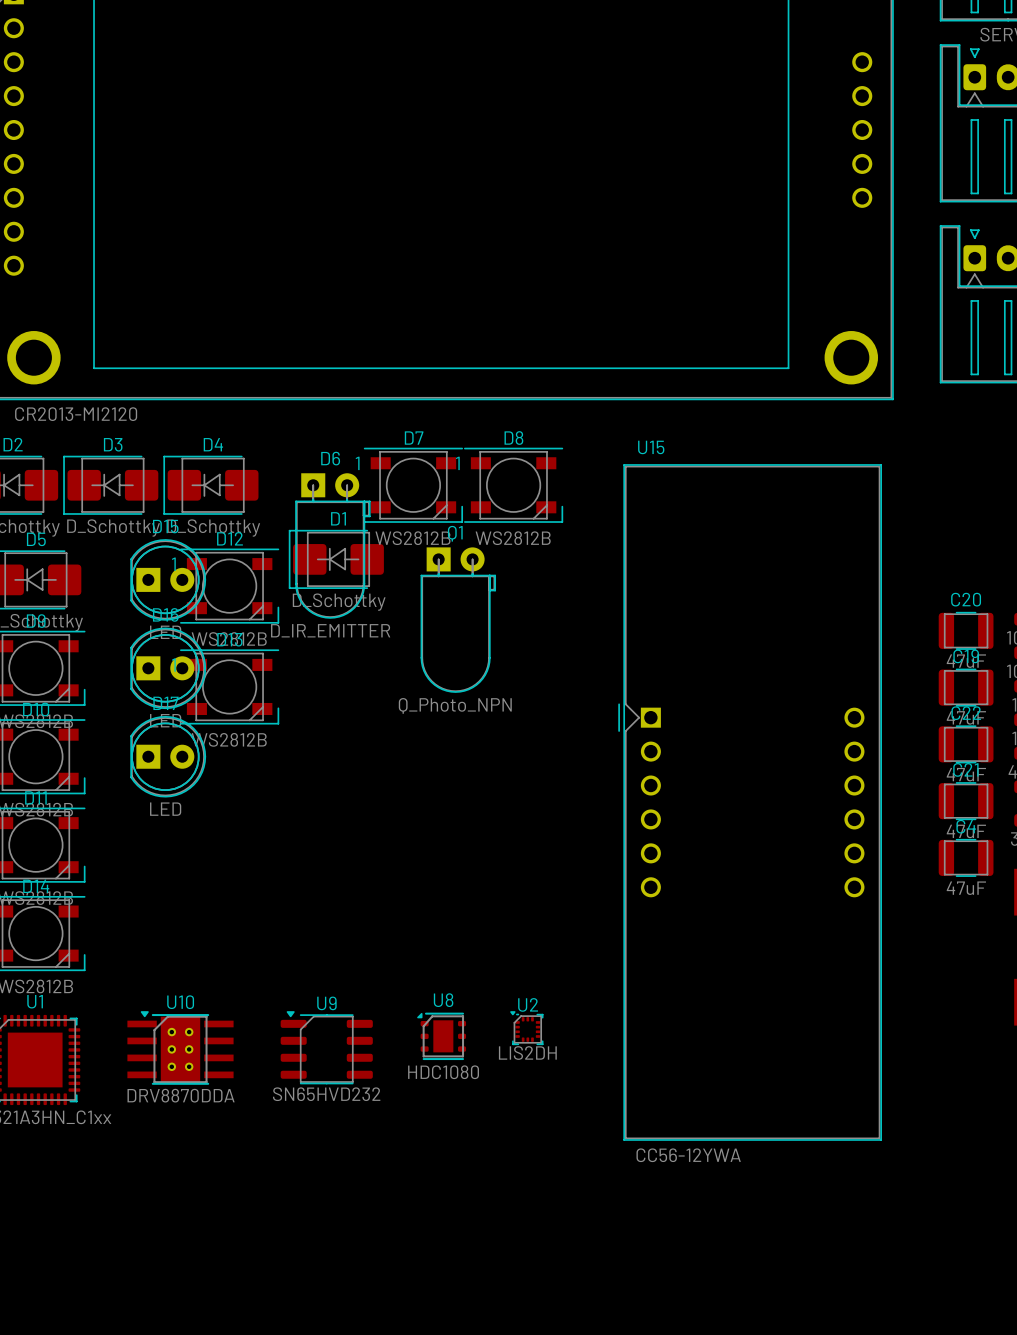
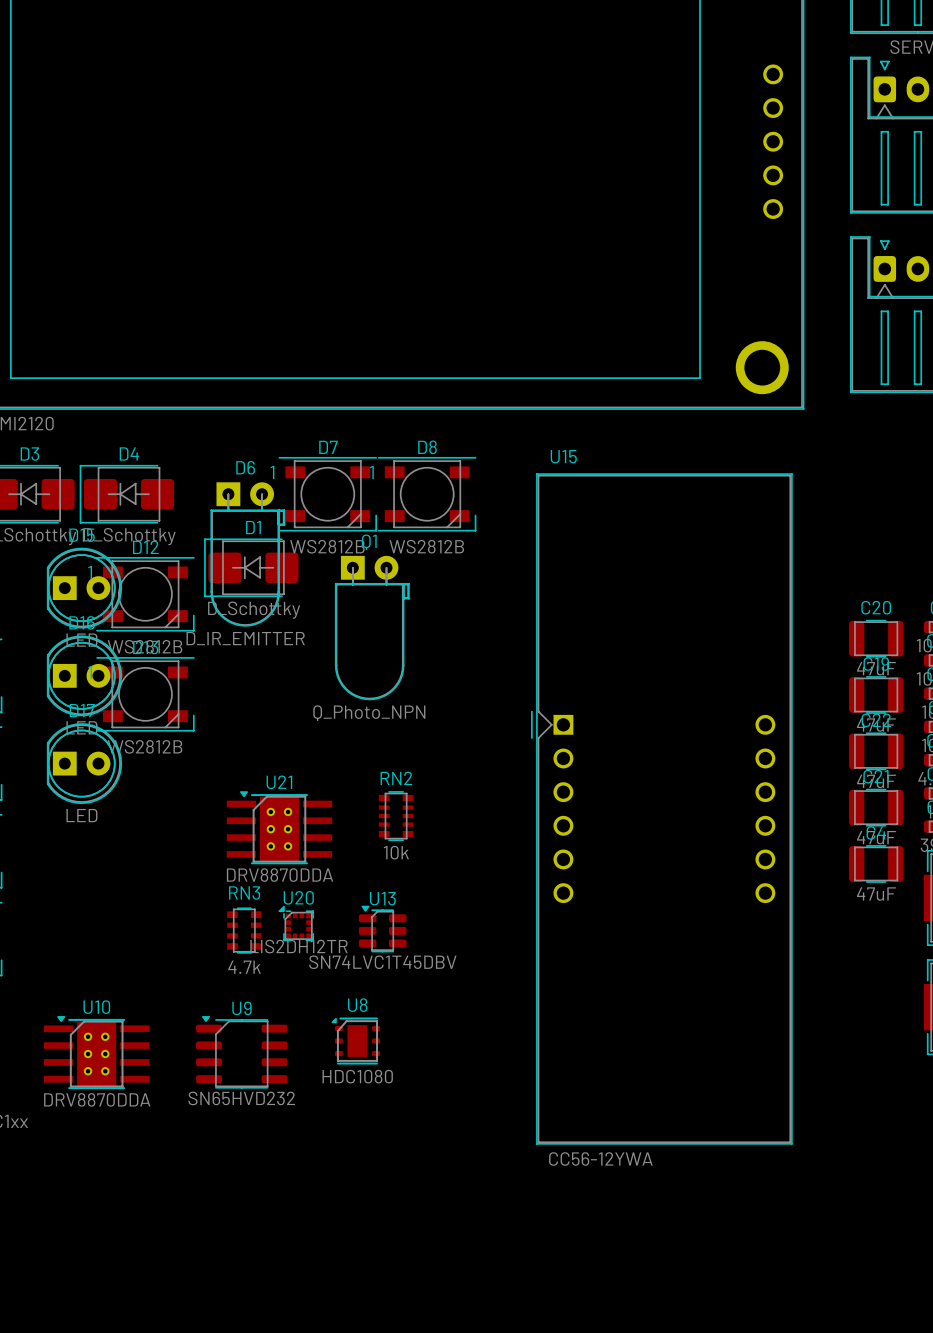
RN2: none -> 10k (396, 816)
U21: none -> DRV8870DDA (279, 827)
U20: none -> LIS2DH12TR (296, 923)
U13: none -> SN74LVC1T45DBV (382, 929)
RN3: none -> 4.7k (244, 930)
U2: LIS2DH (526, 1028) -> none

